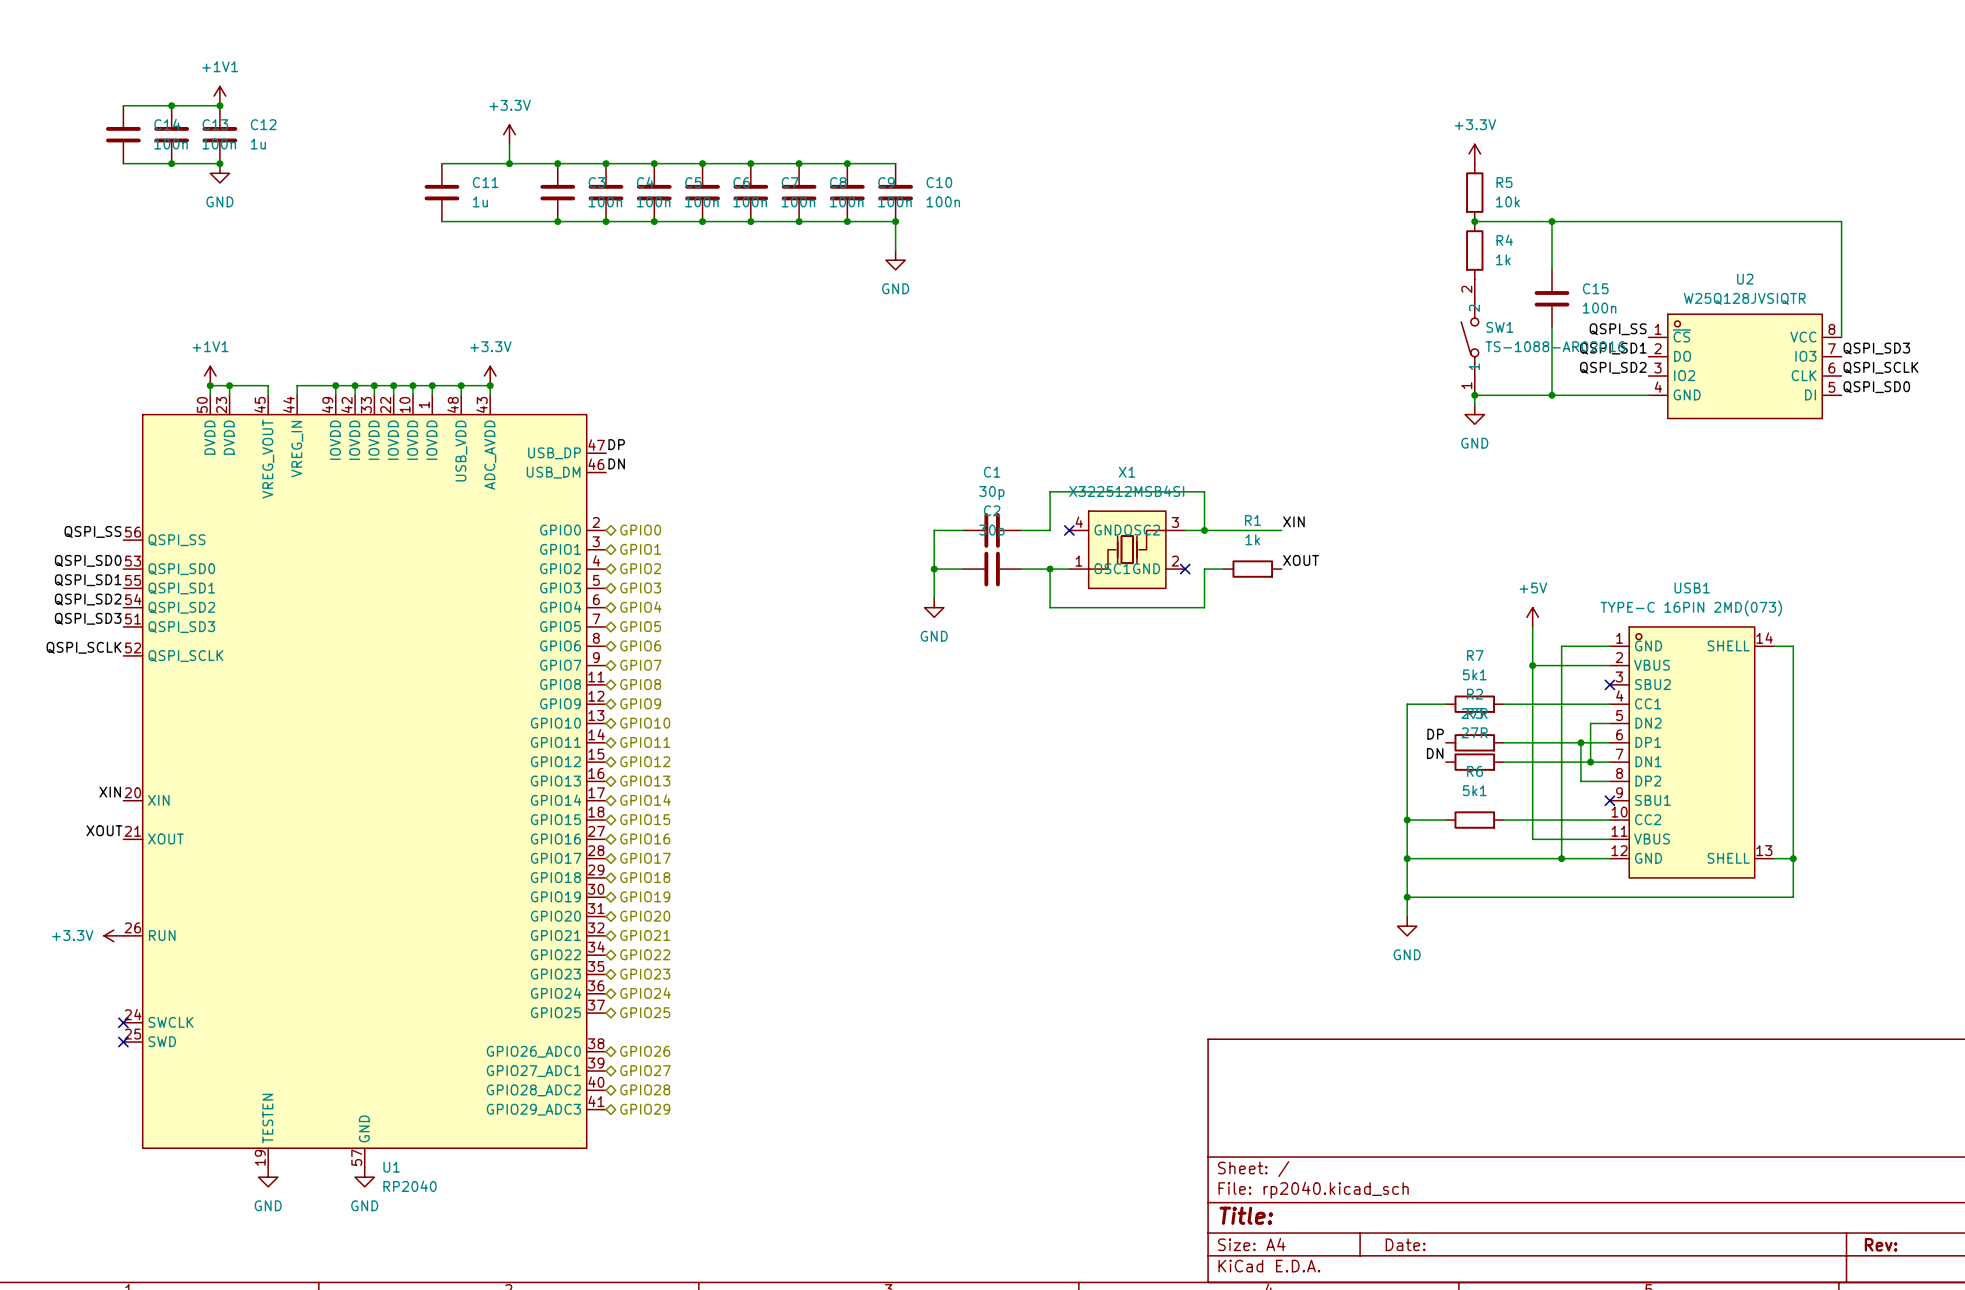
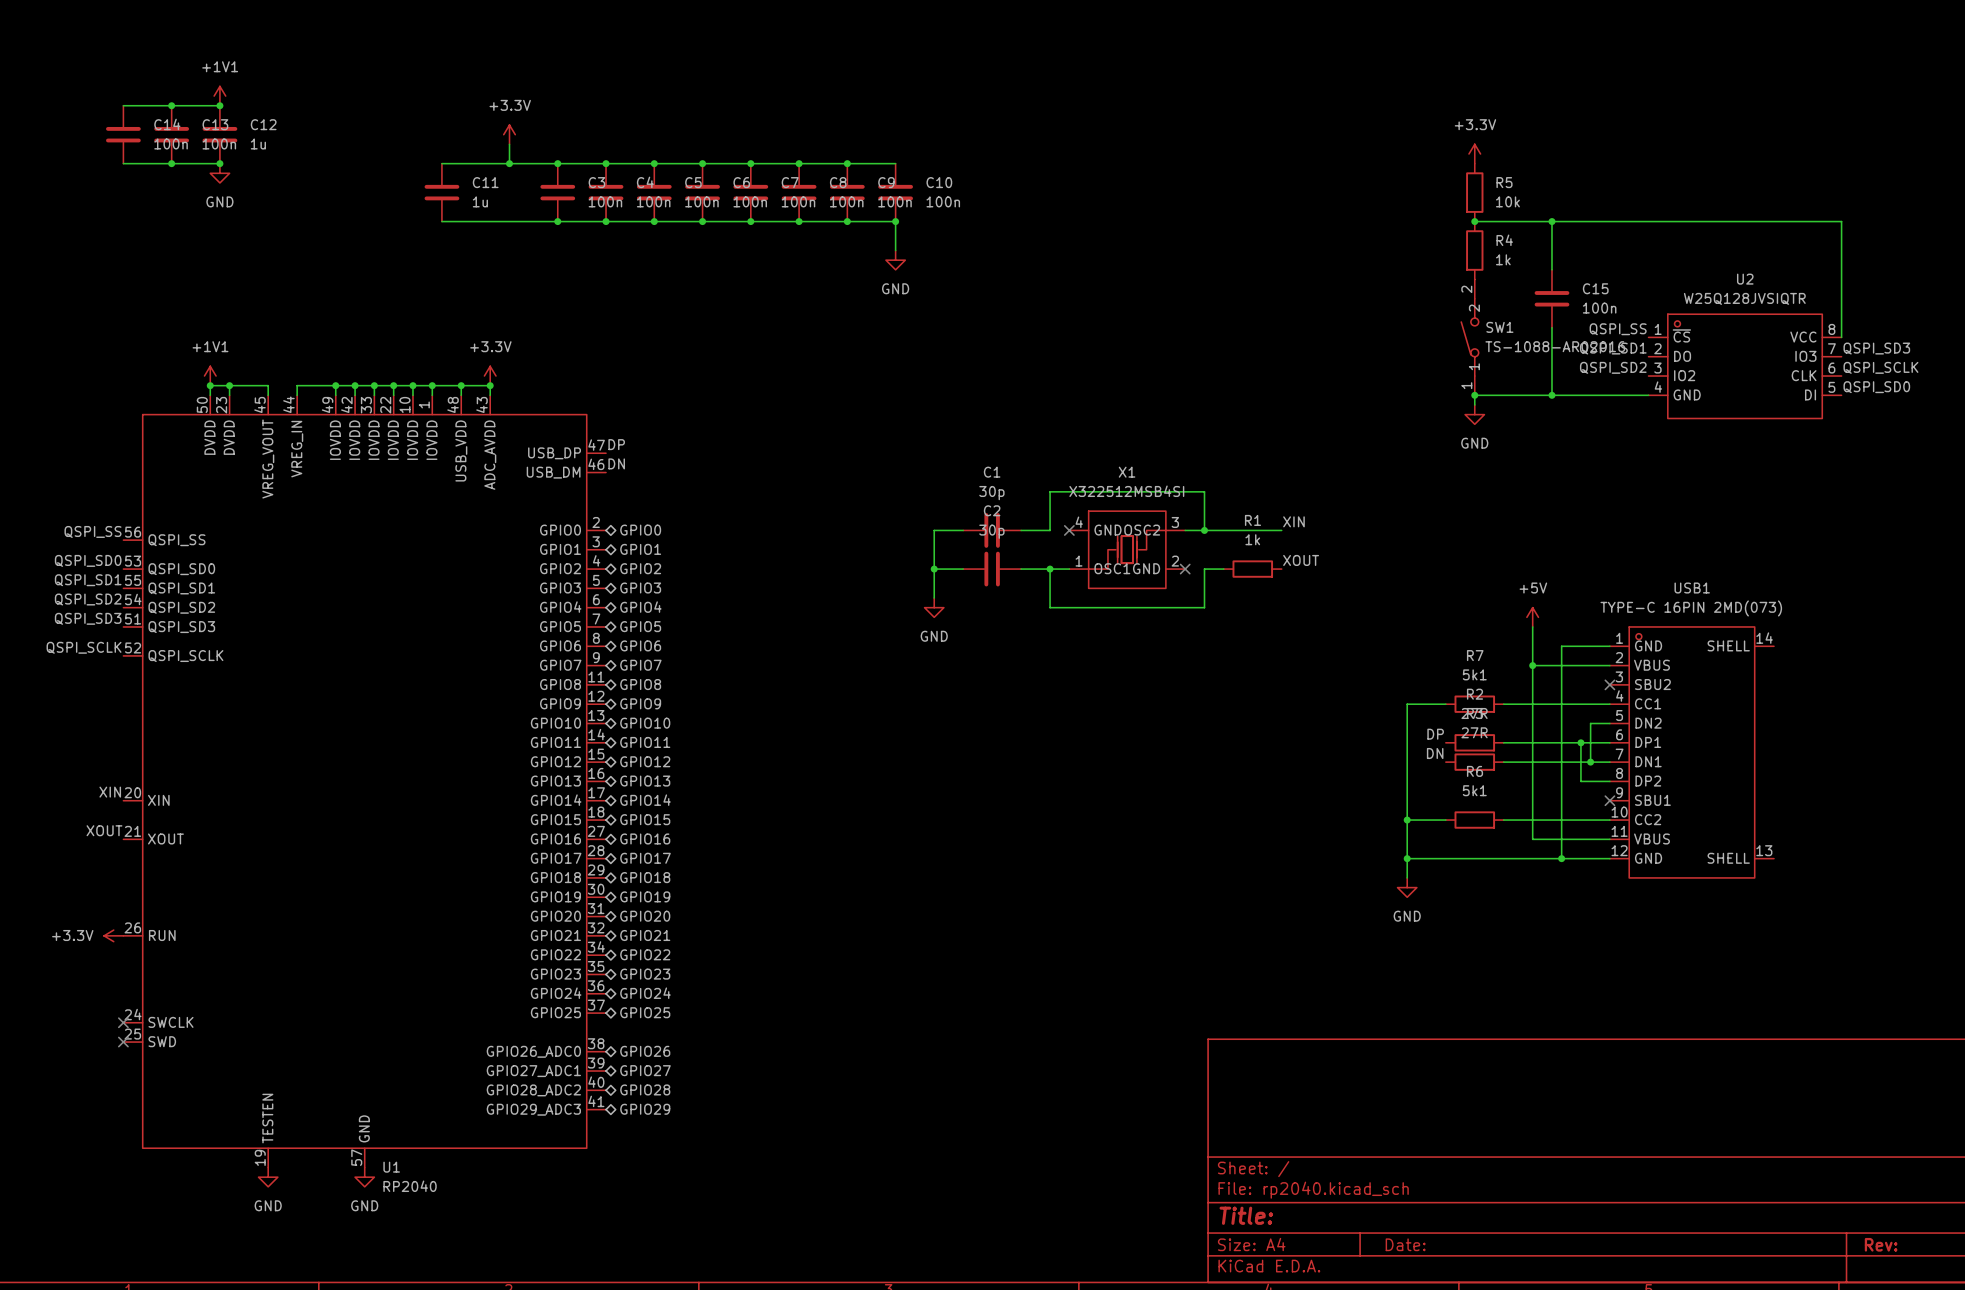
wire: (1774, 646) (1793, 646) (1793, 897) (1407, 897) -> none
wire: (1774, 858) (1793, 858) -> none
junction: (1793, 858) -> none
wire: (1407, 877) (1407, 916) -> none
junction: (1407, 897) -> none
power symbol position: GND (1407, 926) -> GND (1407, 887)

